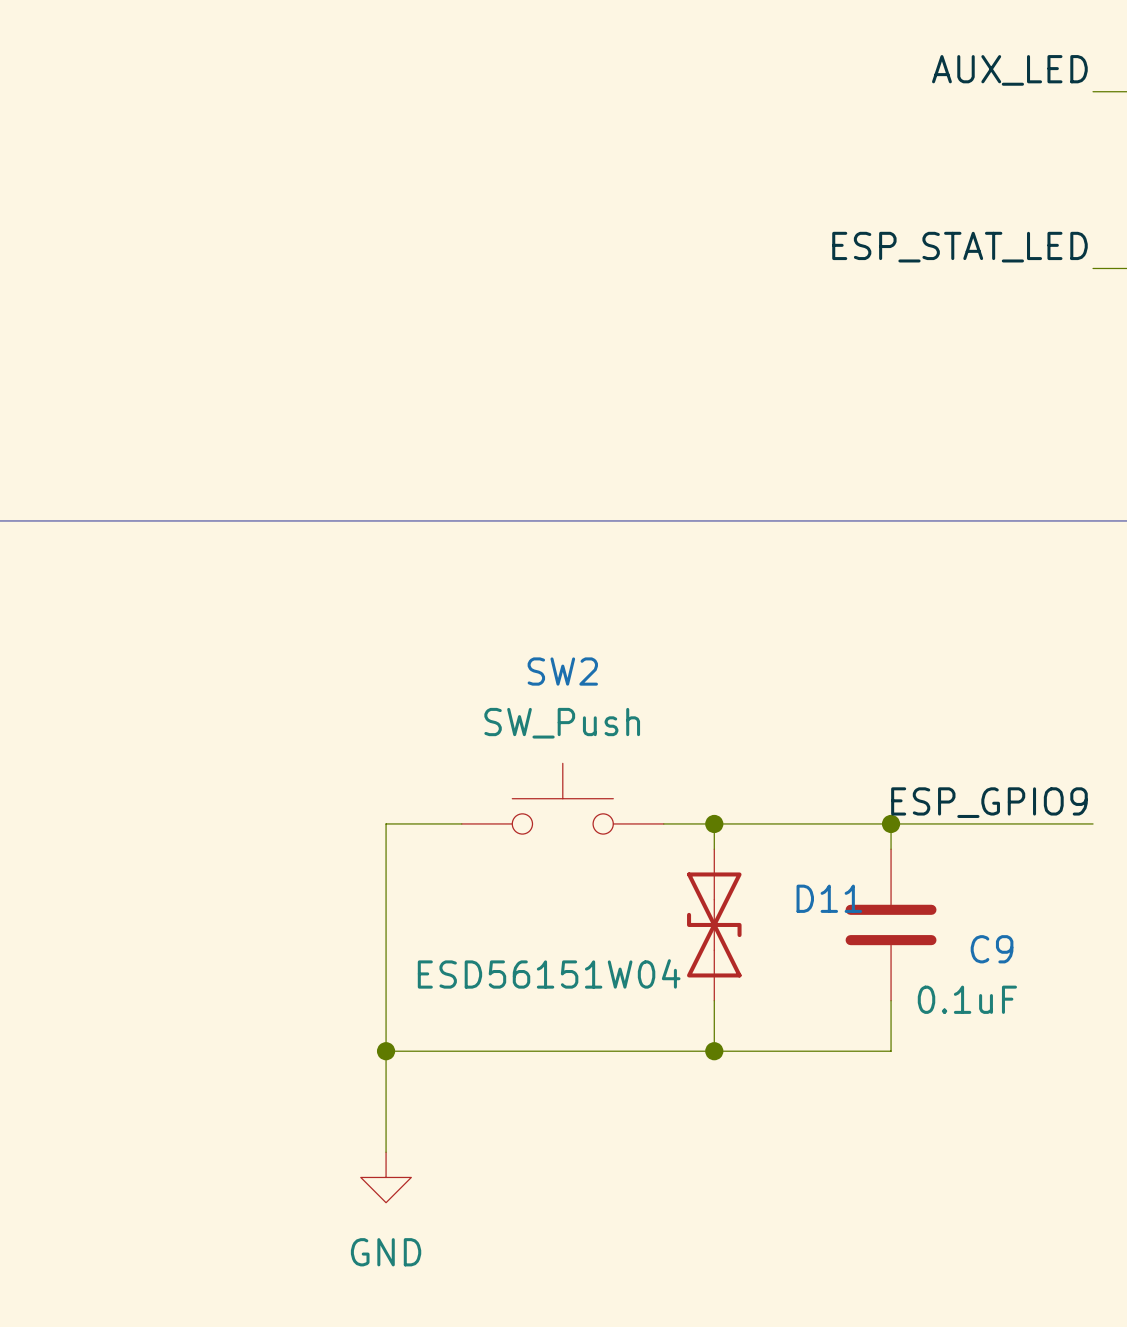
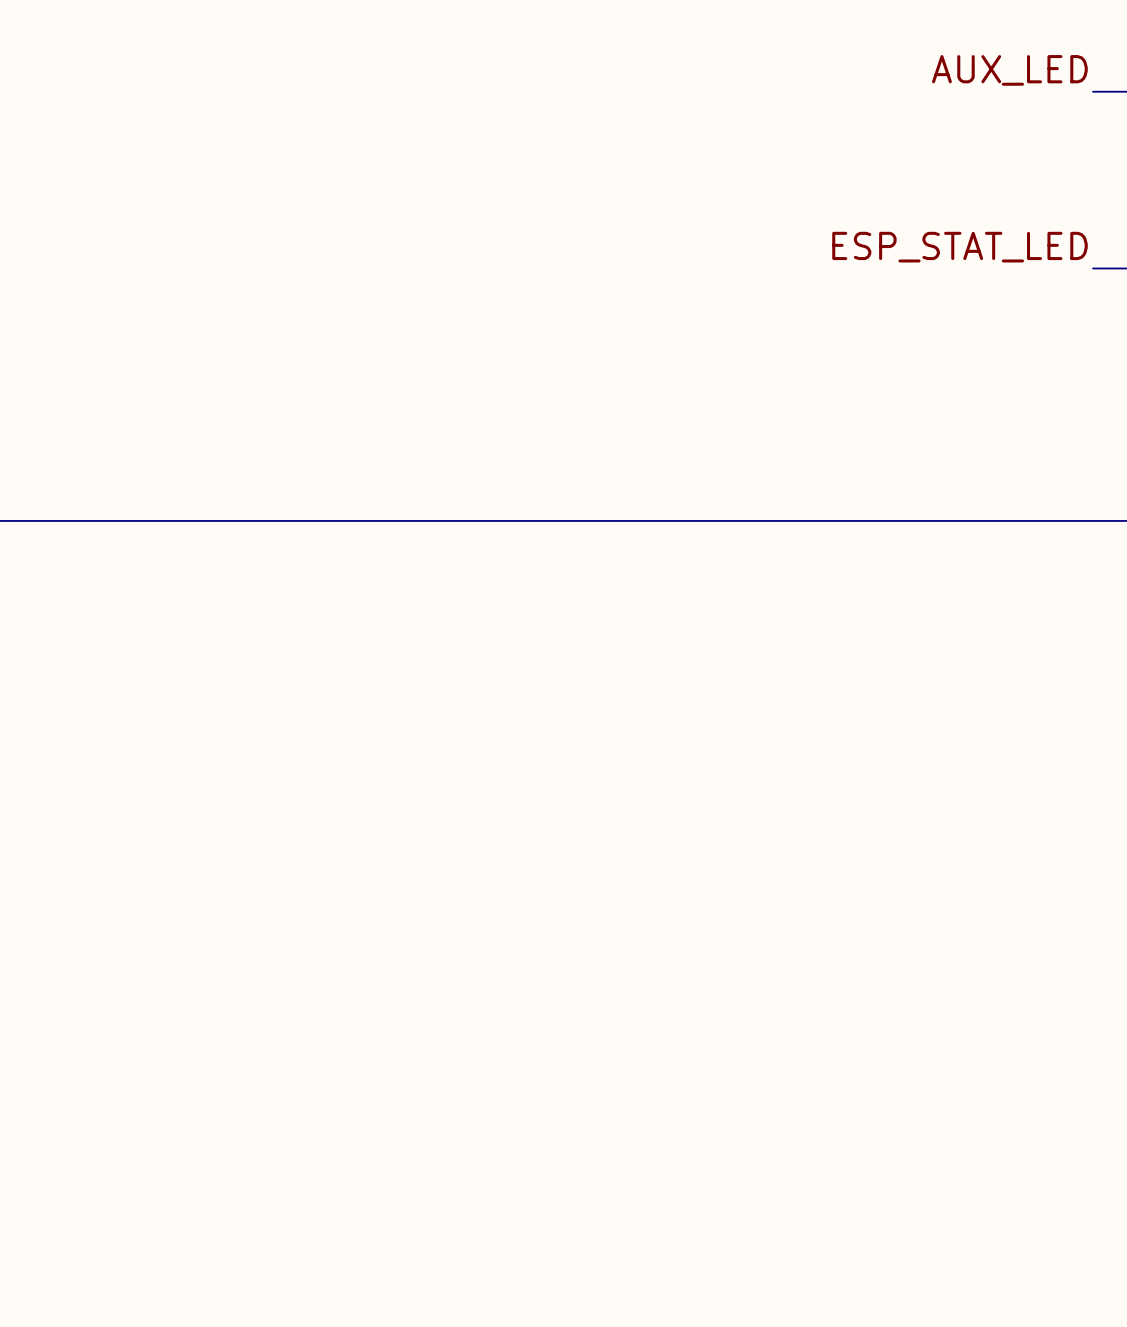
SW2: SW_Push (562, 798) -> none
label: ESP_GPIO9 (989, 802) -> none
wire: (461, 823) (386, 823) (386, 1152) -> none
wire: (663, 823) (1093, 823) -> none
wire: (714, 823) (714, 849) -> none
junction: (714, 823) -> none
wire: (891, 823) (891, 849) -> none
junction: (891, 823) -> none
D11: ESD56151W04 (714, 924) -> none
C9: 0.1uF (891, 924) -> none
wire: (714, 1000) (714, 1051) -> none
wire: (891, 1000) (891, 1051) (386, 1051) -> none
junction: (386, 1051) -> none
junction: (714, 1051) -> none
power symbol: GND (386, 1177) -> none

